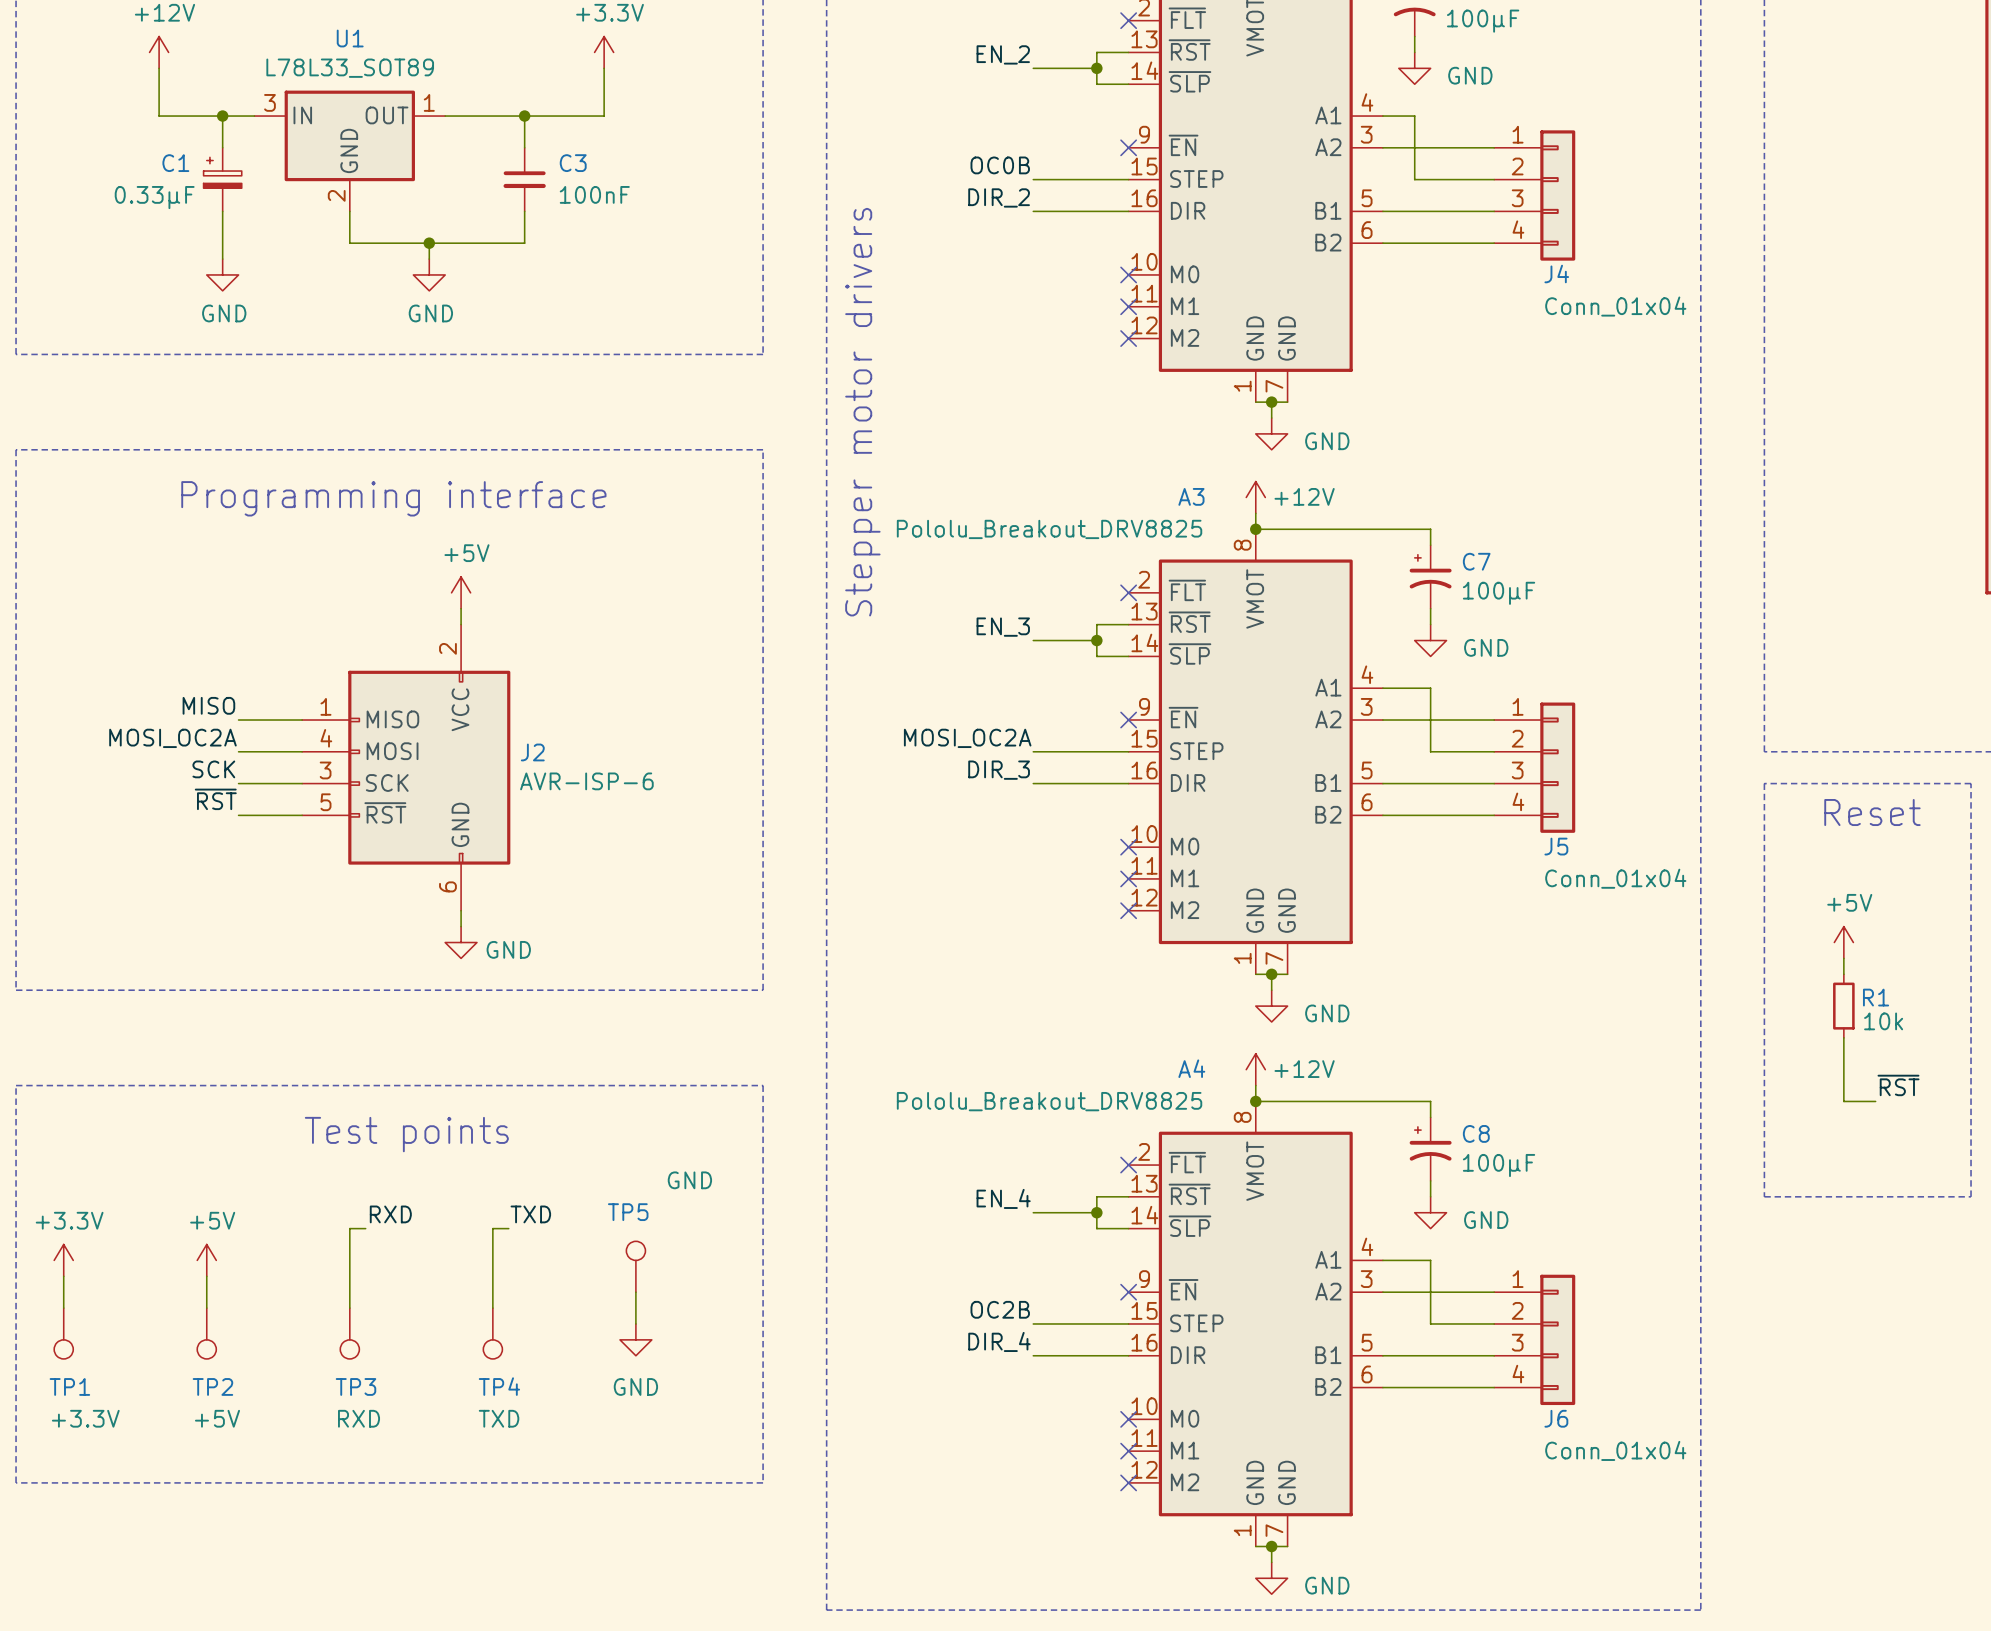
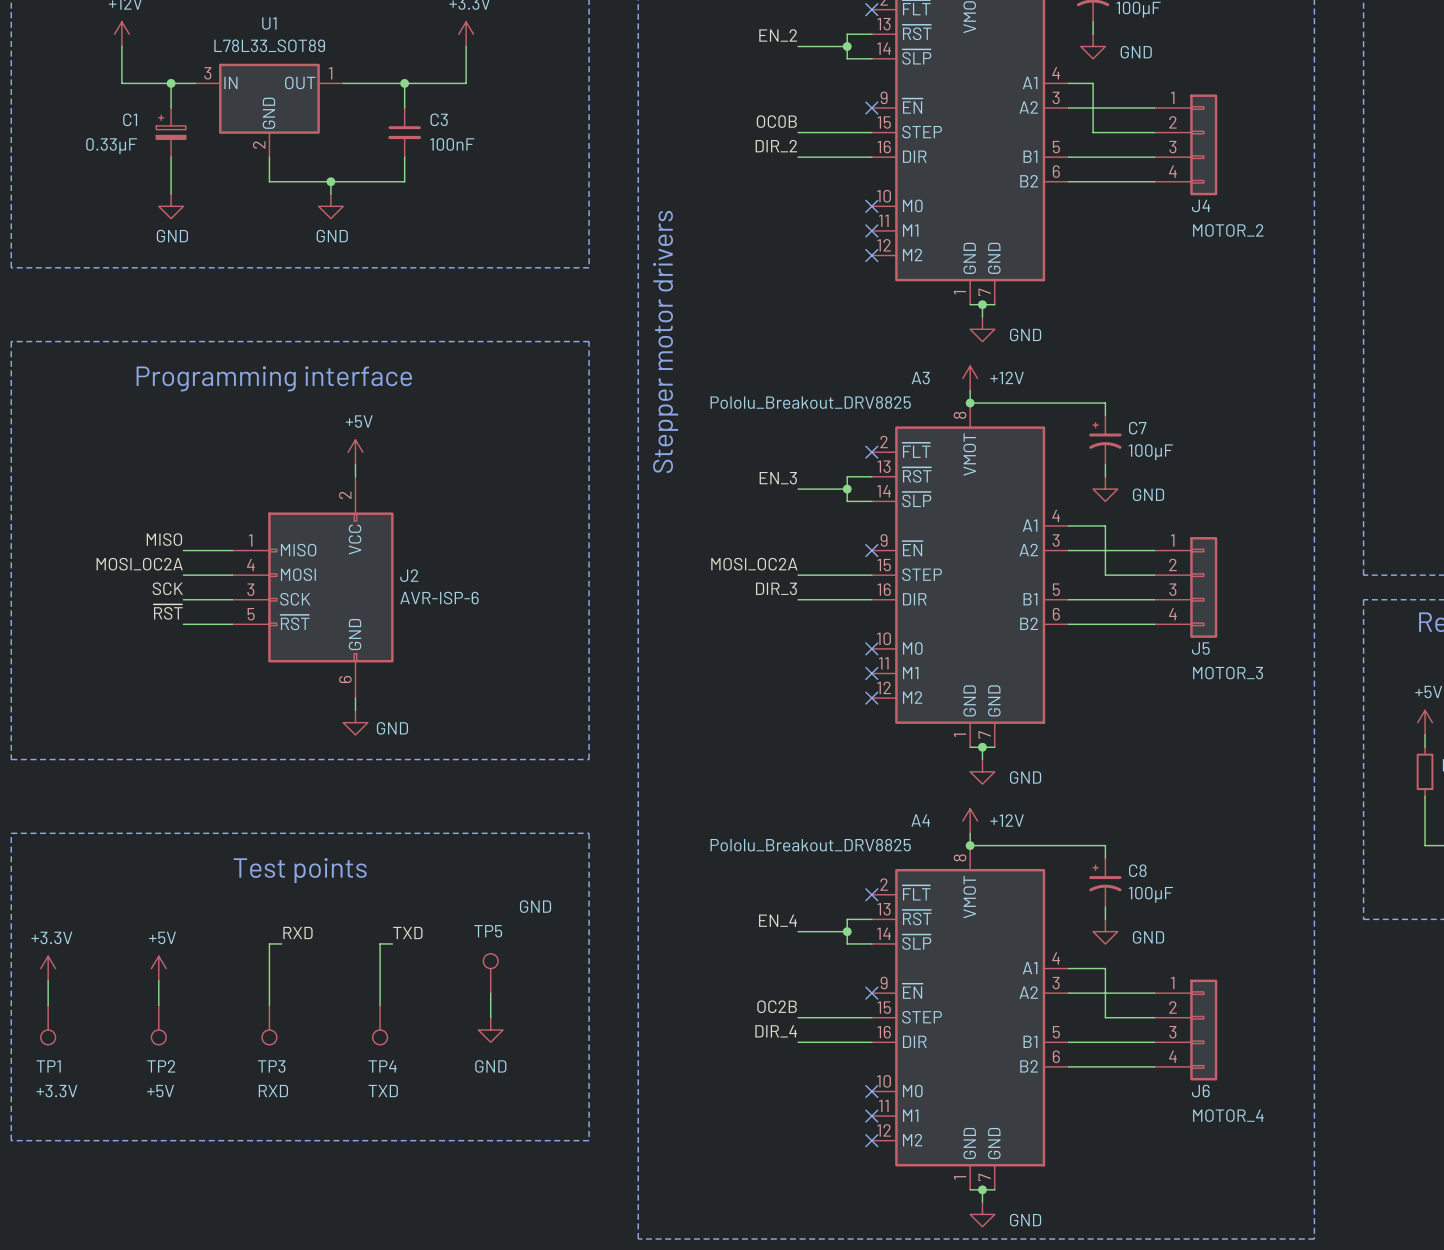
J4 value: Conn_01x04 (1615, 306) -> MOTOR_2 (1228, 230)
J5 value: Conn_01x04 (1615, 878) -> MOTOR_3 (1228, 673)
J6 value: Conn_01x04 (1615, 1450) -> MOTOR_4 (1228, 1115)

